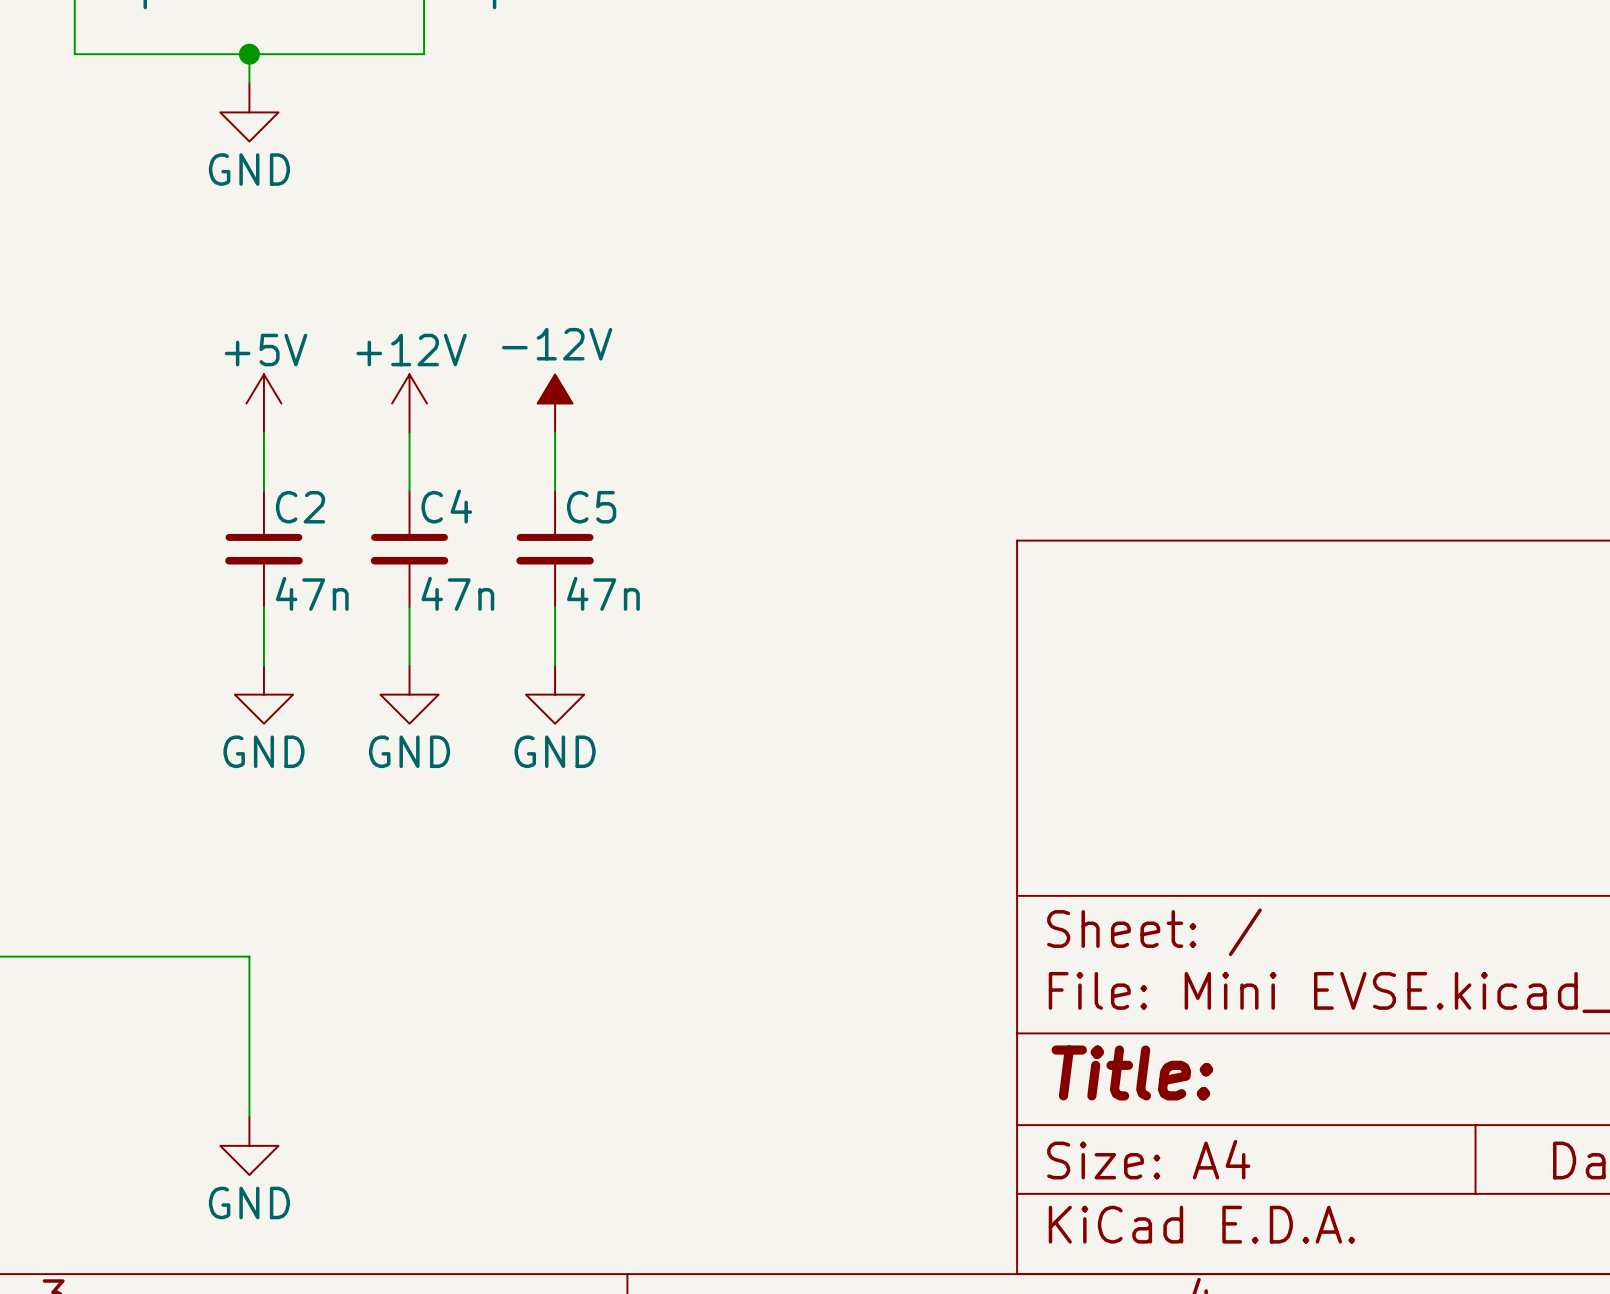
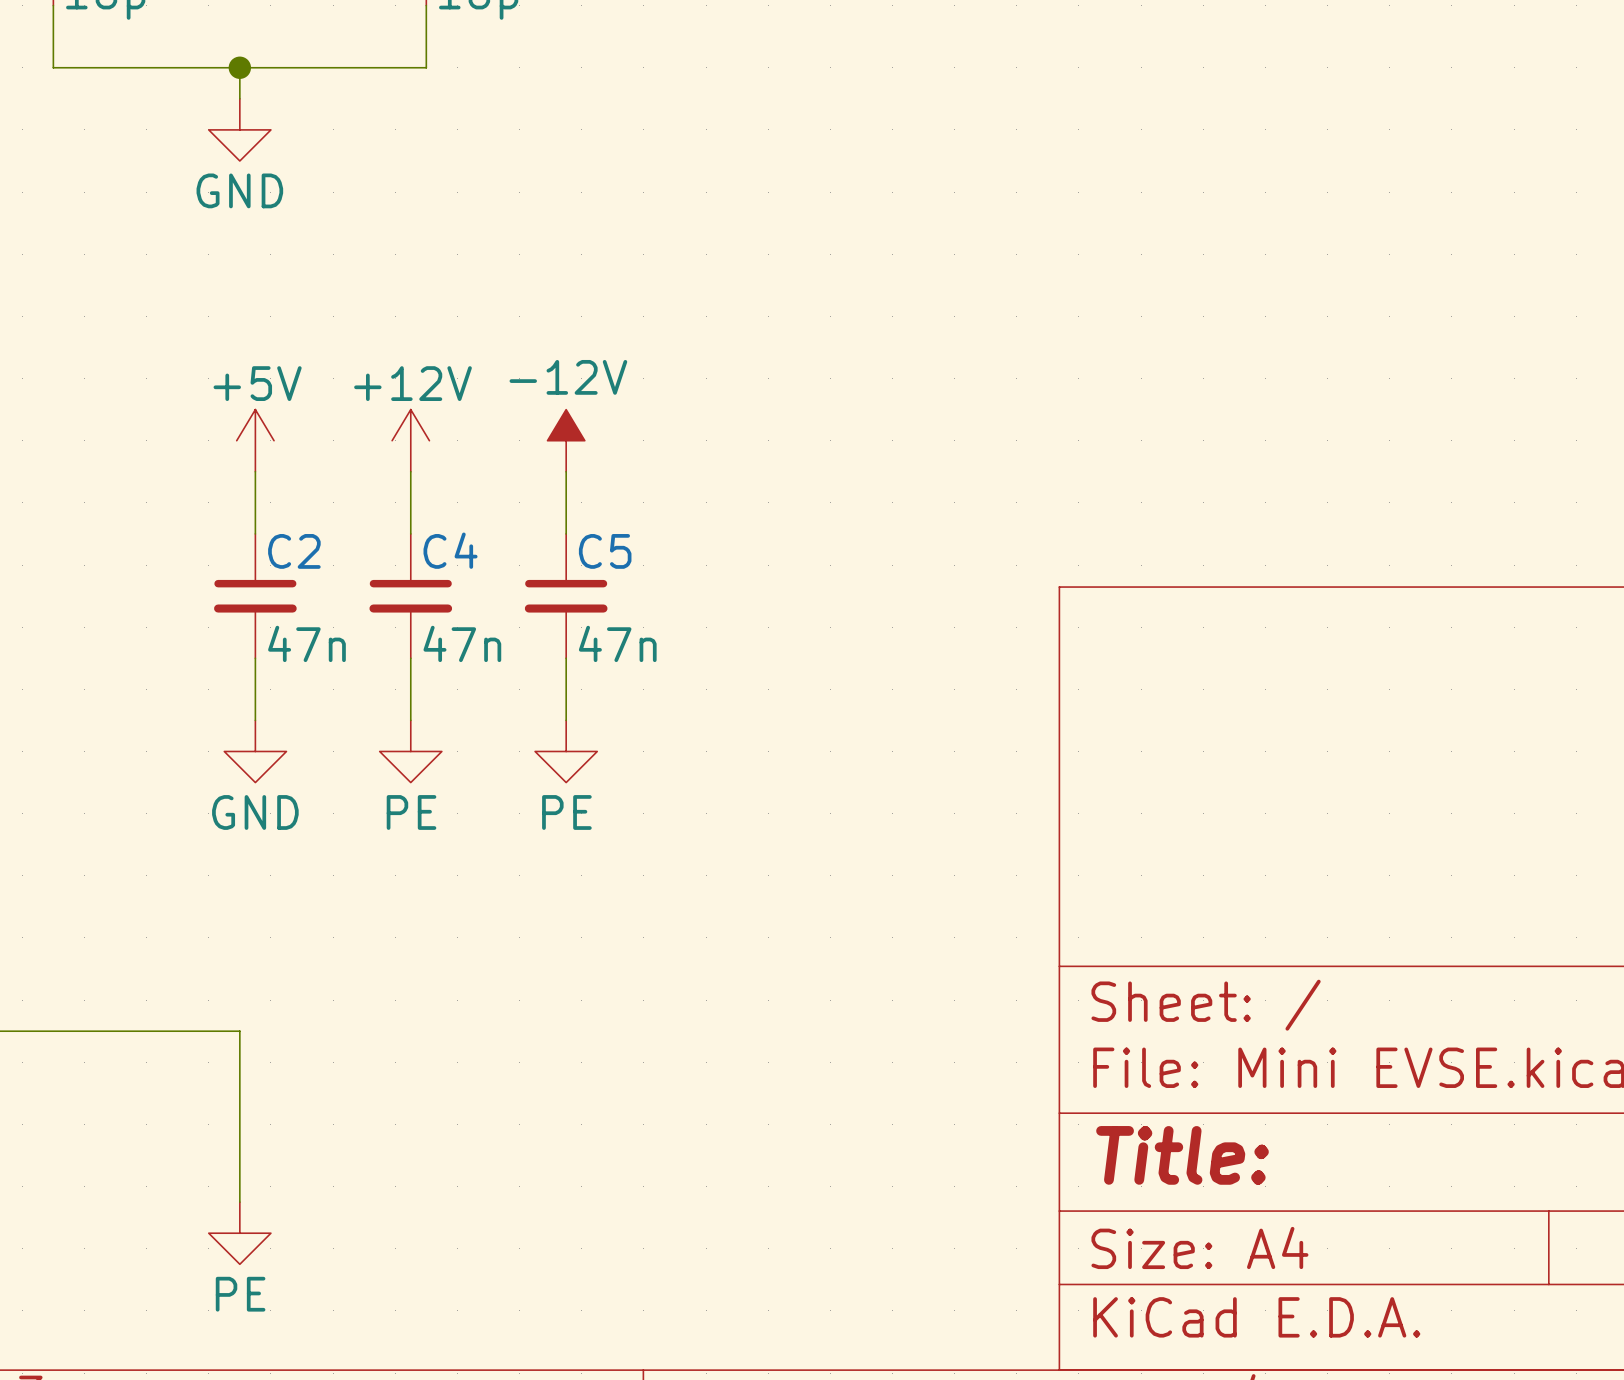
power symbol: GND (409, 694) -> PE (410, 751)
power symbol: GND (555, 694) -> PE (566, 751)
power symbol: GND (249, 1145) -> PE (239, 1233)

